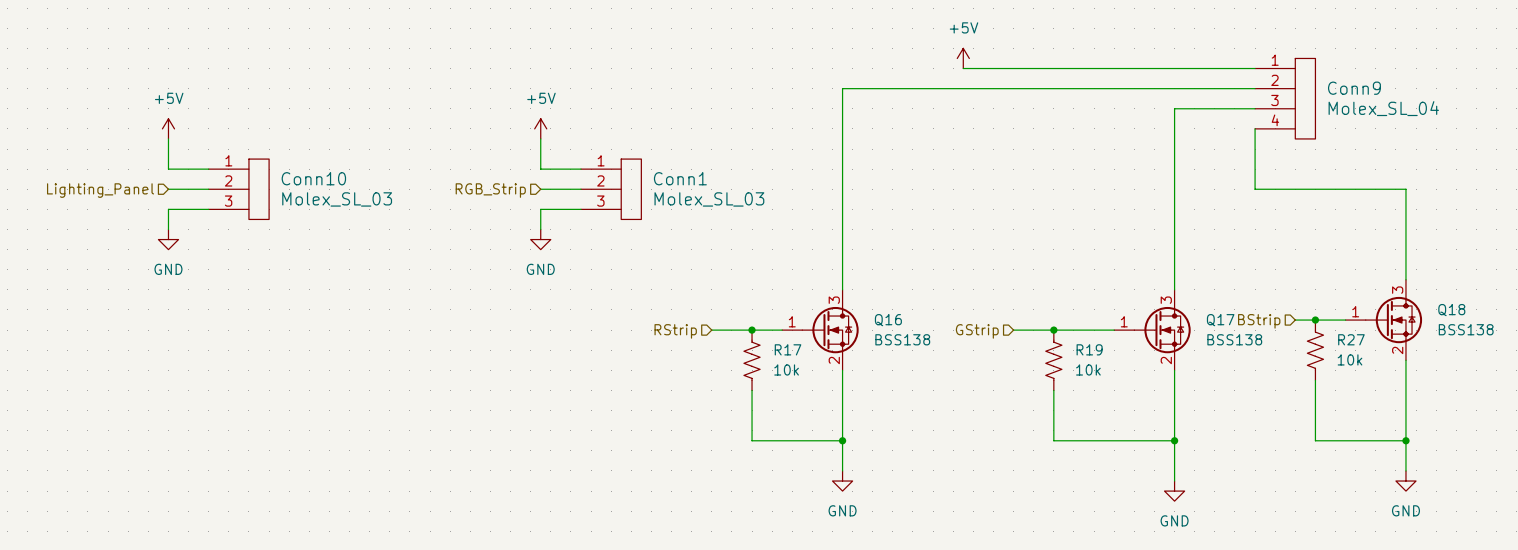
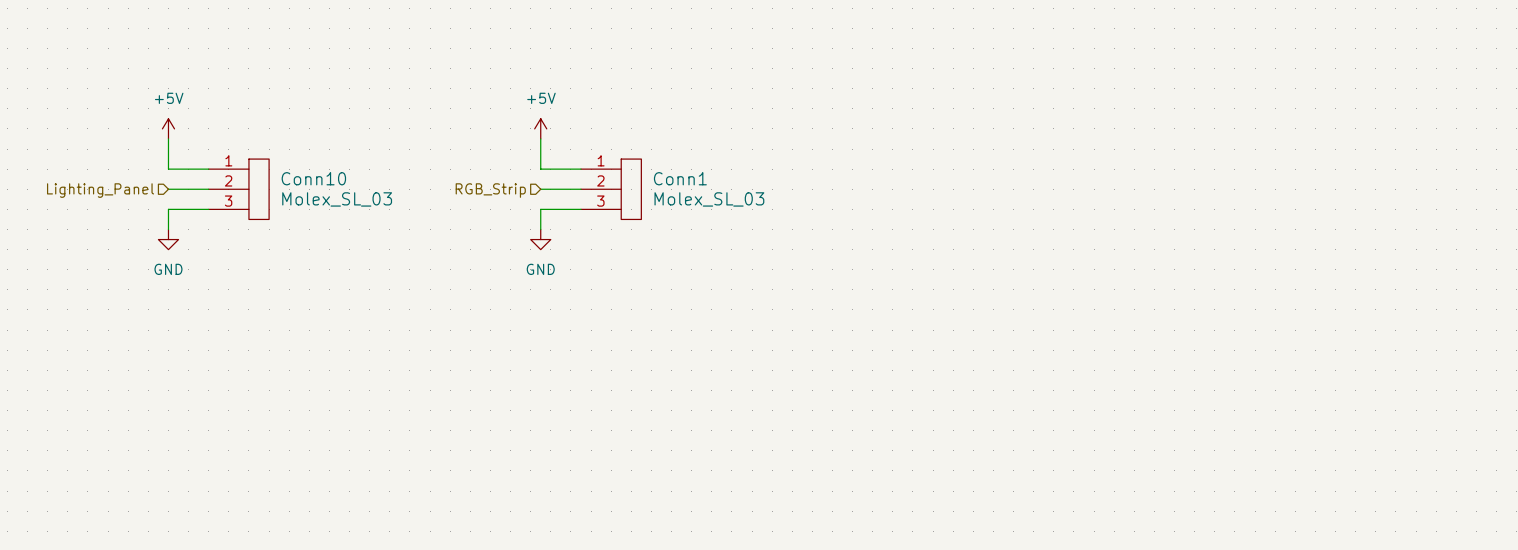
power symbol: +5V (963, 58) -> none
wire: (963, 68) (1255, 68) -> none
wire: (1255, 88) (842, 88) (842, 289) -> none
Conn9: Molex_SL_04 (1285, 98) -> none
wire: (1255, 108) (1174, 108) (1174, 289) -> none
wire: (1255, 128) (1255, 189) (1405, 189) (1405, 279) -> none
wire: (1295, 320) (1345, 320) -> none
junction: (1315, 320) -> none
Q18: BSS138 (1383, 320) -> none
hierarchical label: BStrip (1259, 321) -> none
wire: (711, 330) (782, 330) -> none
junction: (752, 330) -> none
Q16: BSS138 (820, 330) -> none
wire: (1013, 330) (1114, 330) -> none
junction: (1053, 330) -> none
Q17: BSS138 (1152, 330) -> none
hierarchical label: RStrip (675, 331) -> none
hierarchical label: GStrip (977, 331) -> none
R27: 10k (1315, 350) -> none
R17: 10k (752, 360) -> none
R19: 10k (1053, 360) -> none
wire: (1405, 360) (1405, 470) -> none
wire: (842, 370) (842, 470) -> none
wire: (1174, 370) (1174, 481) -> none
wire: (1315, 380) (1315, 440) (1405, 440) -> none
wire: (752, 390) (752, 440) (842, 440) -> none
wire: (1053, 390) (1053, 440) (1174, 440) -> none
junction: (842, 440) -> none
junction: (1174, 440) -> none
junction: (1405, 440) -> none
power symbol: GND (842, 481) -> none
power symbol: GND (1405, 481) -> none
power symbol: GND (1174, 491) -> none

